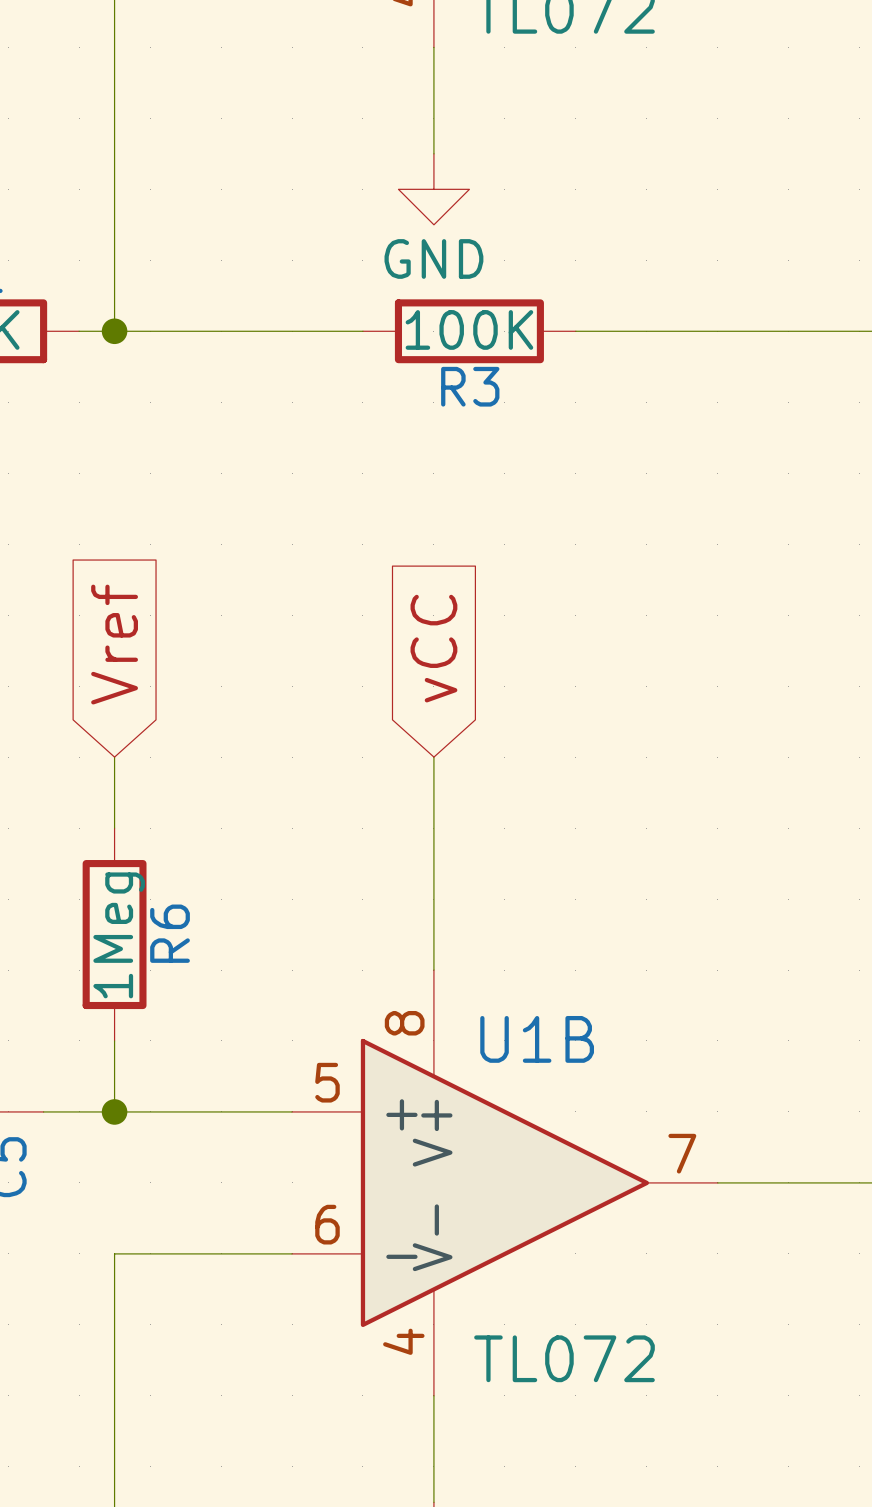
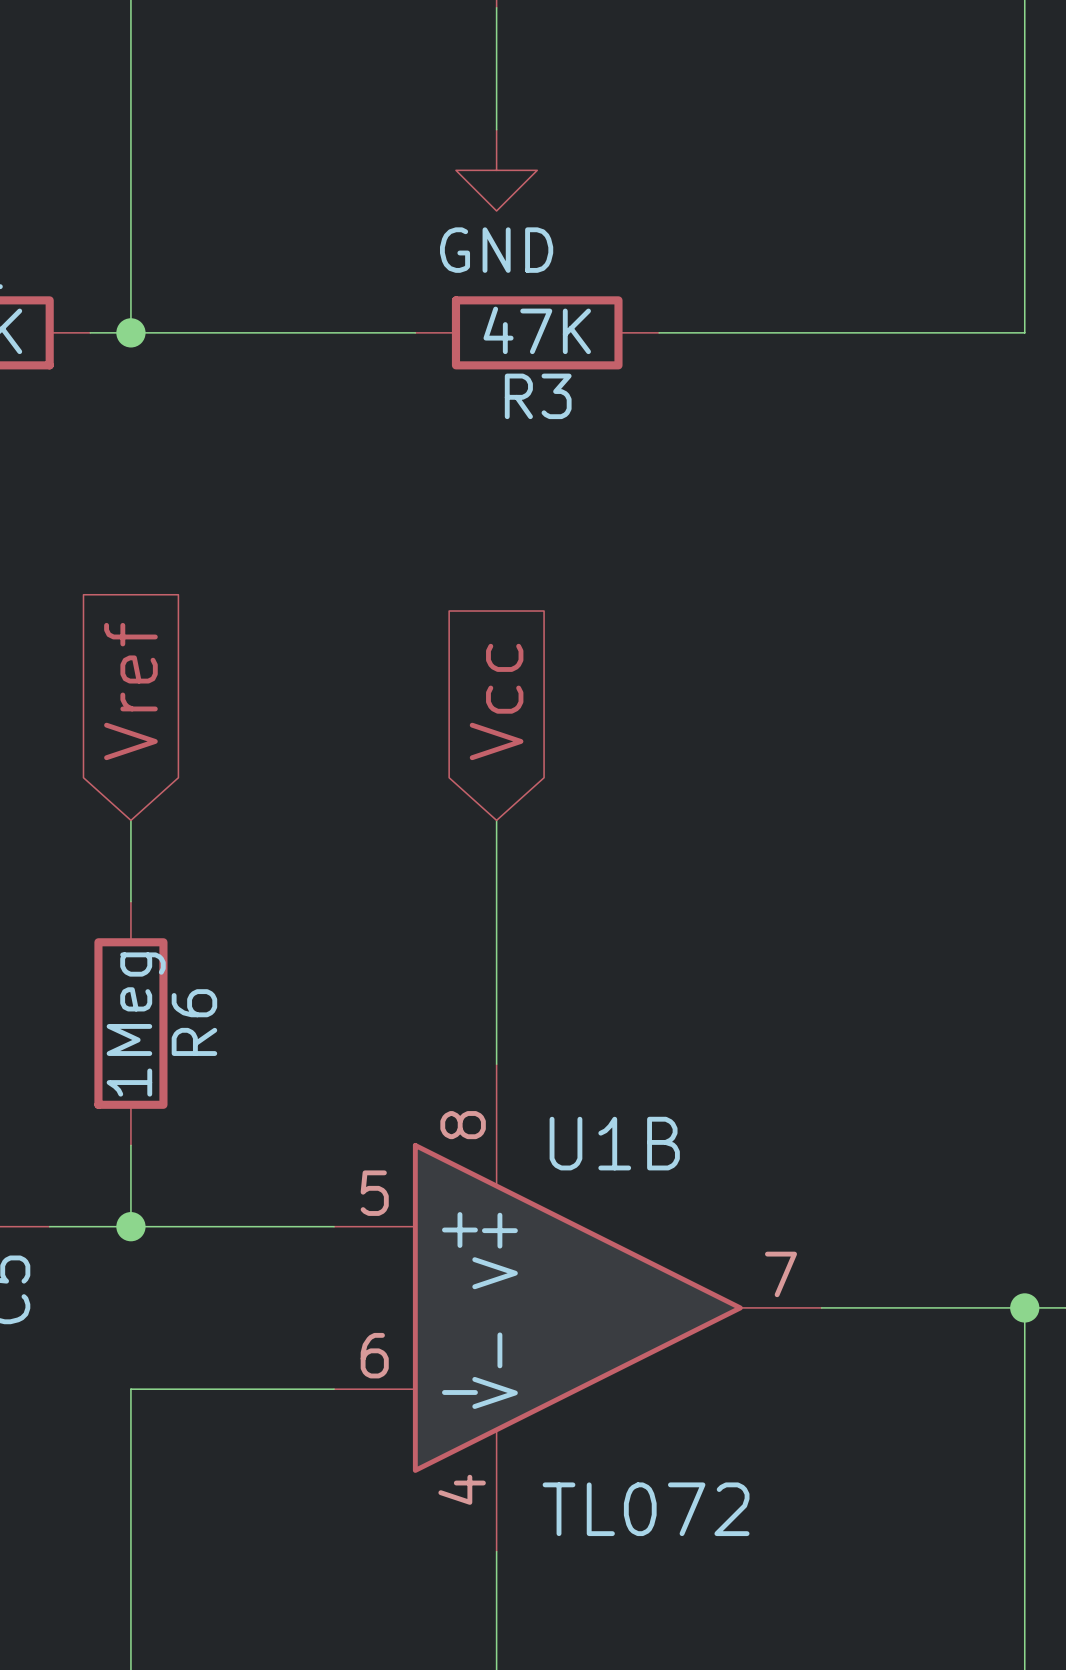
R3 value: 100K (469, 329) -> 47K (537, 330)
global label: vCC (433, 648) -> Vcc (496, 701)

